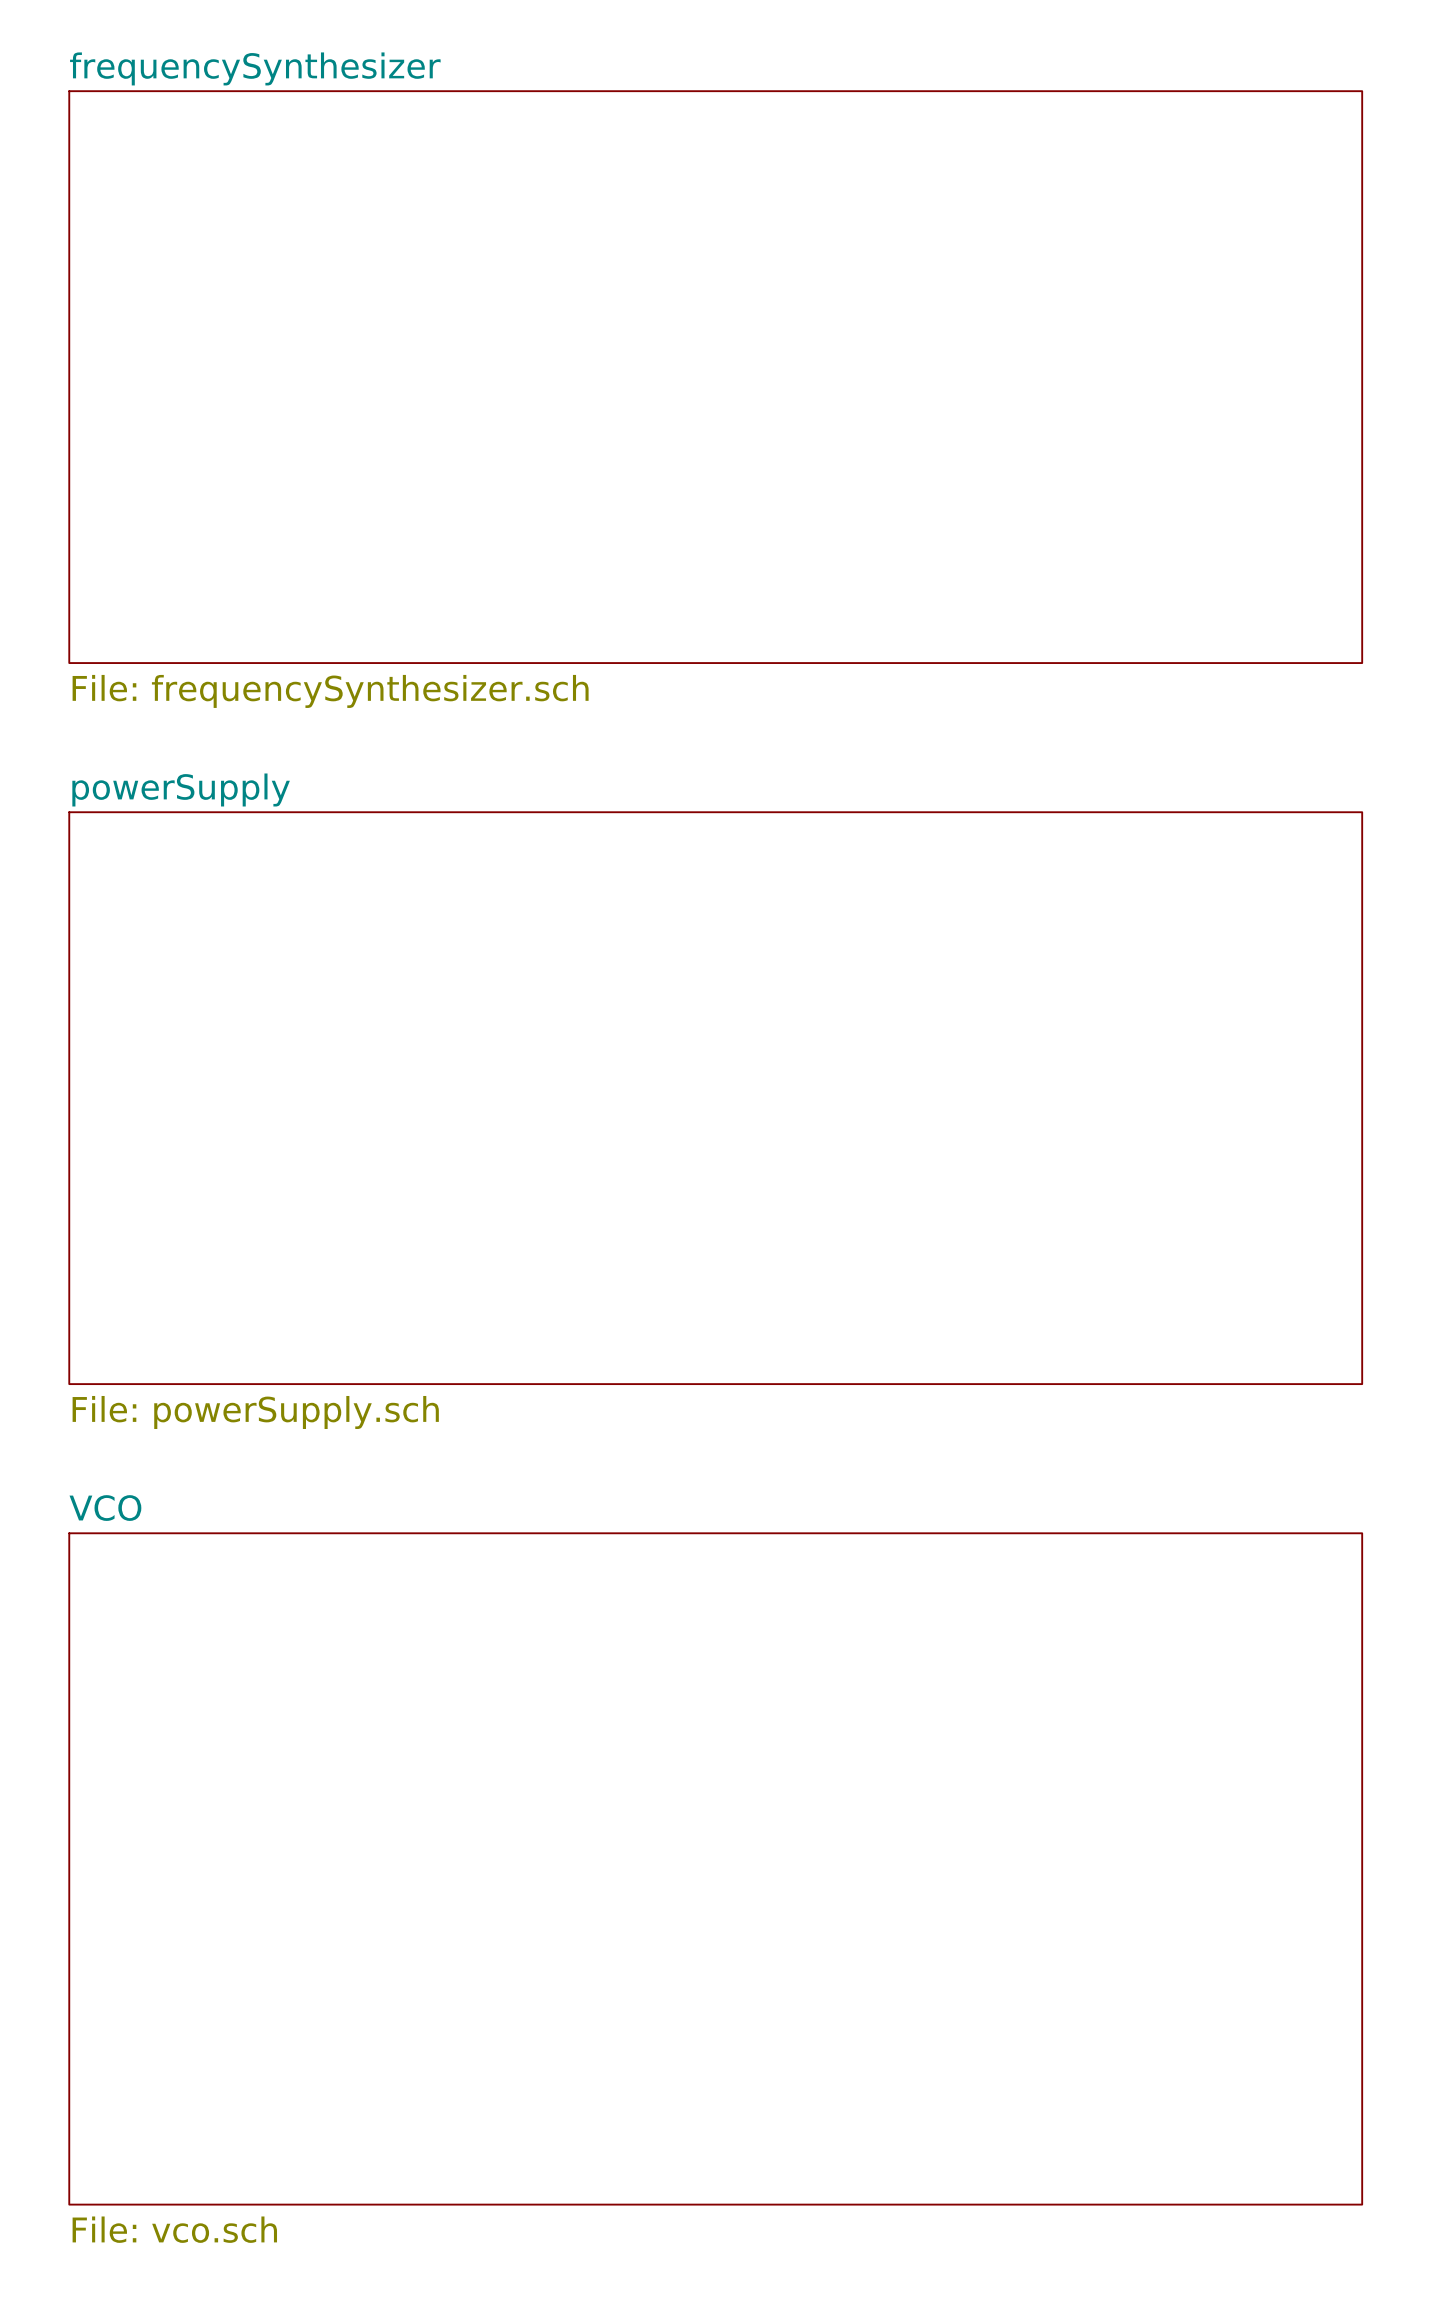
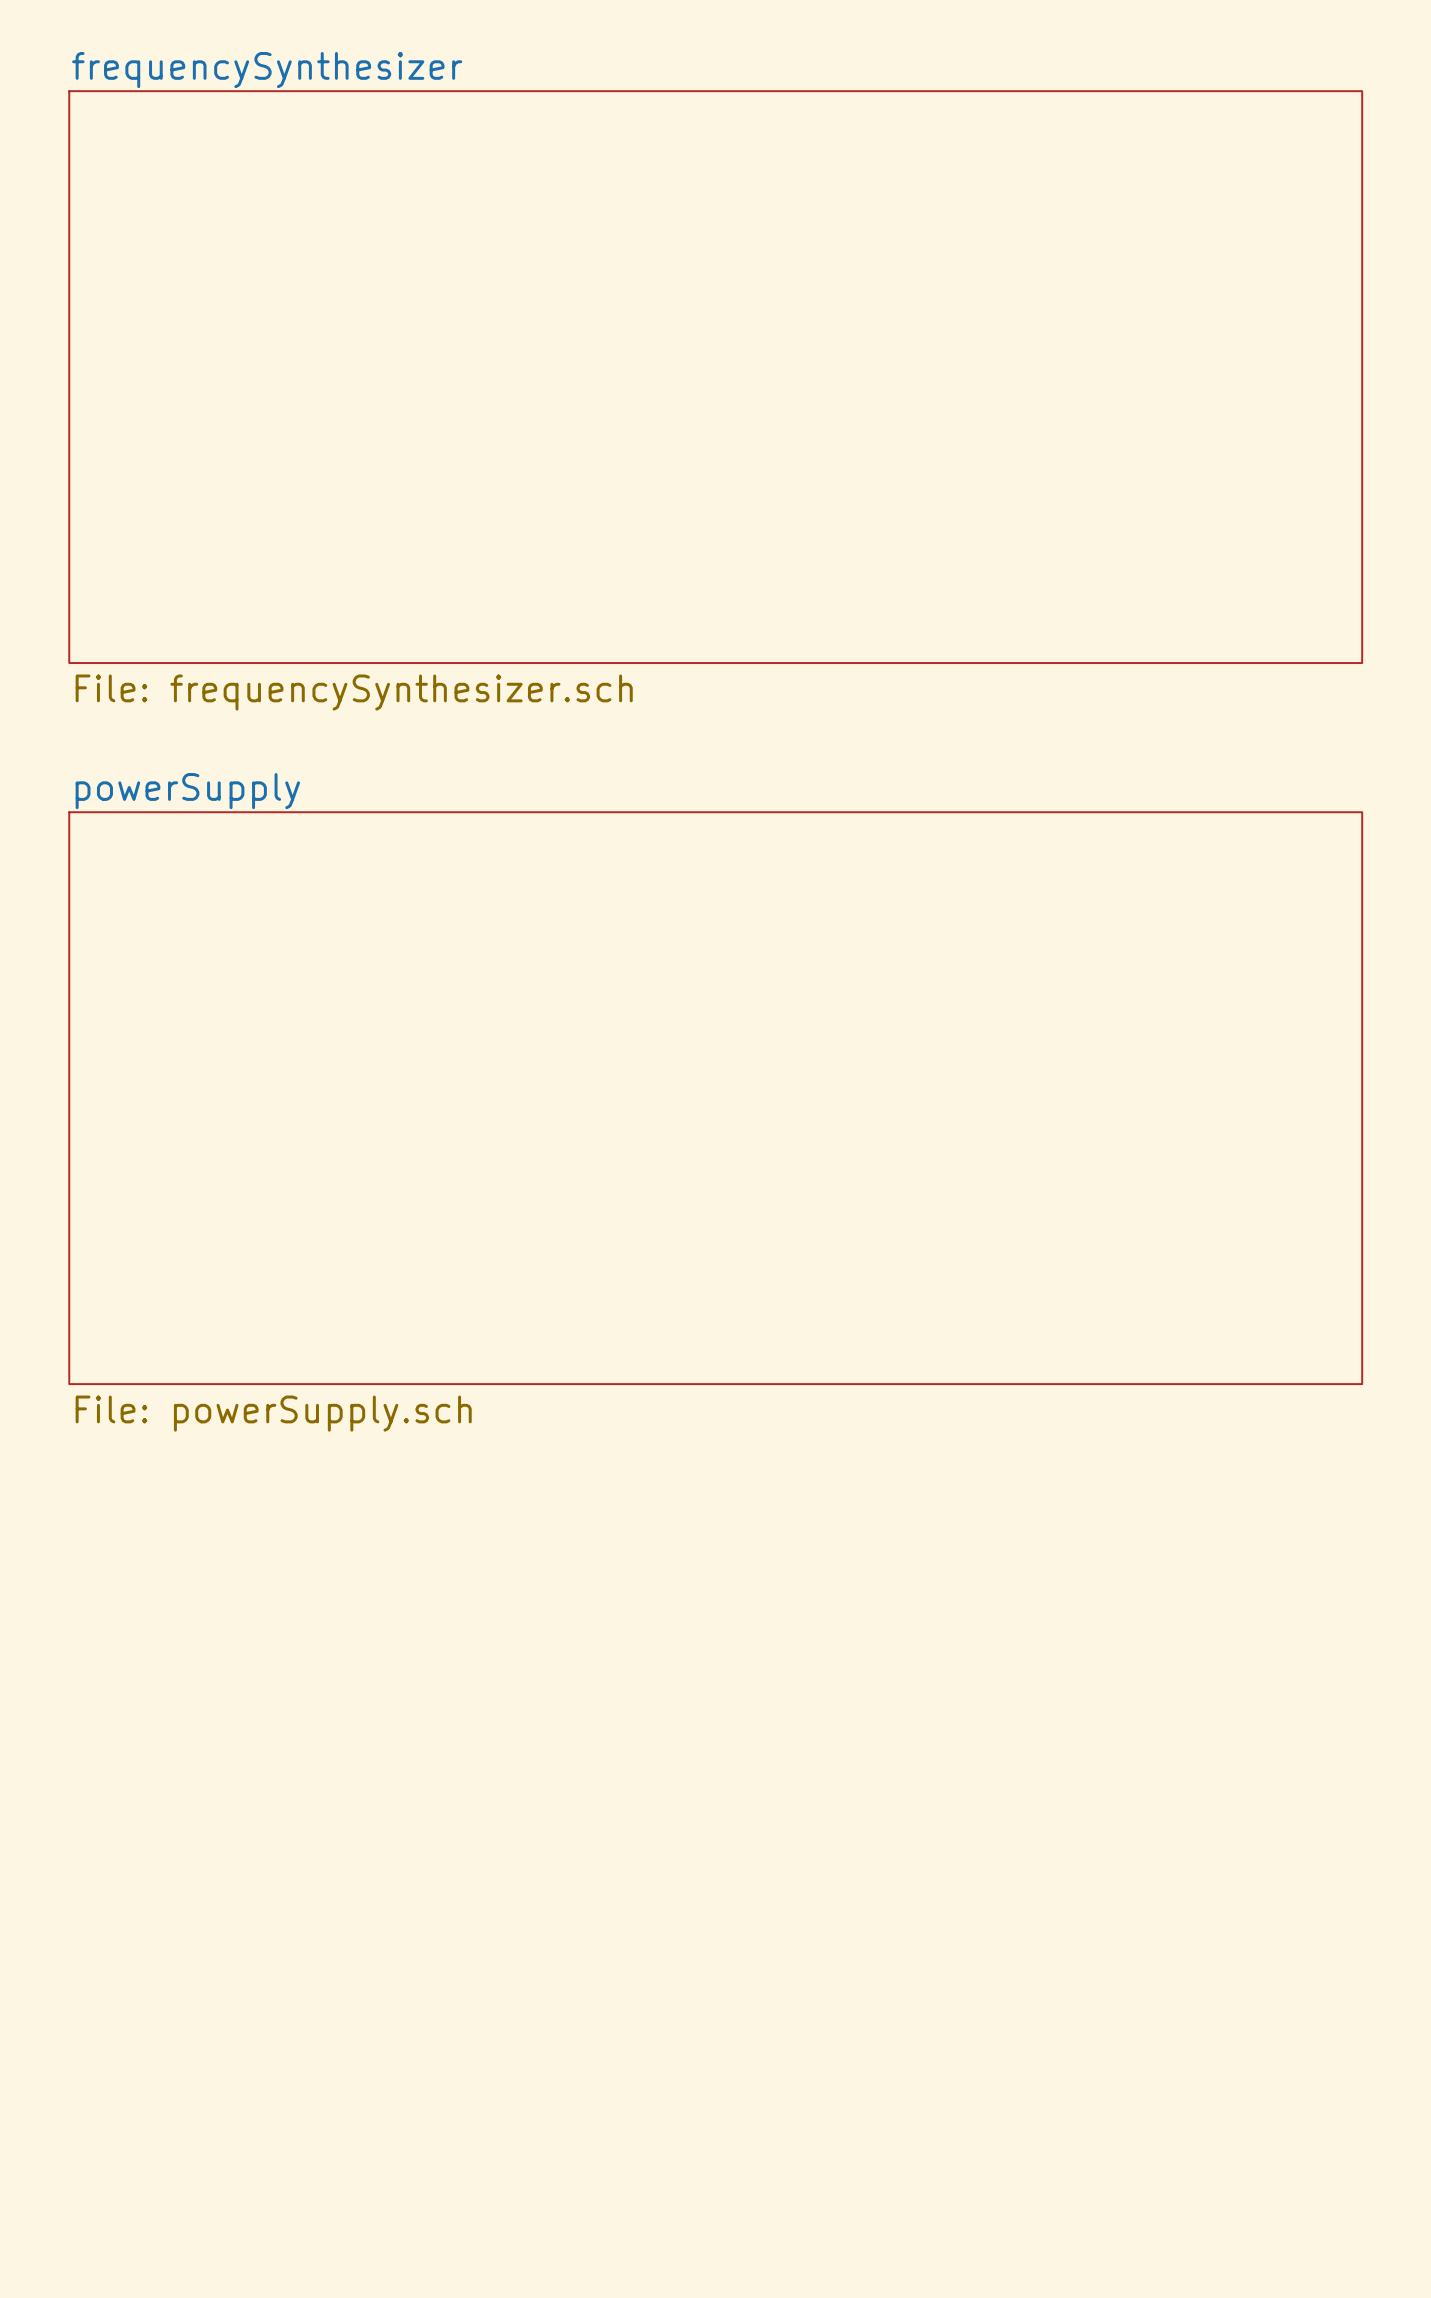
sheet VCO: File: vco.sch (715, 1868) -> none

